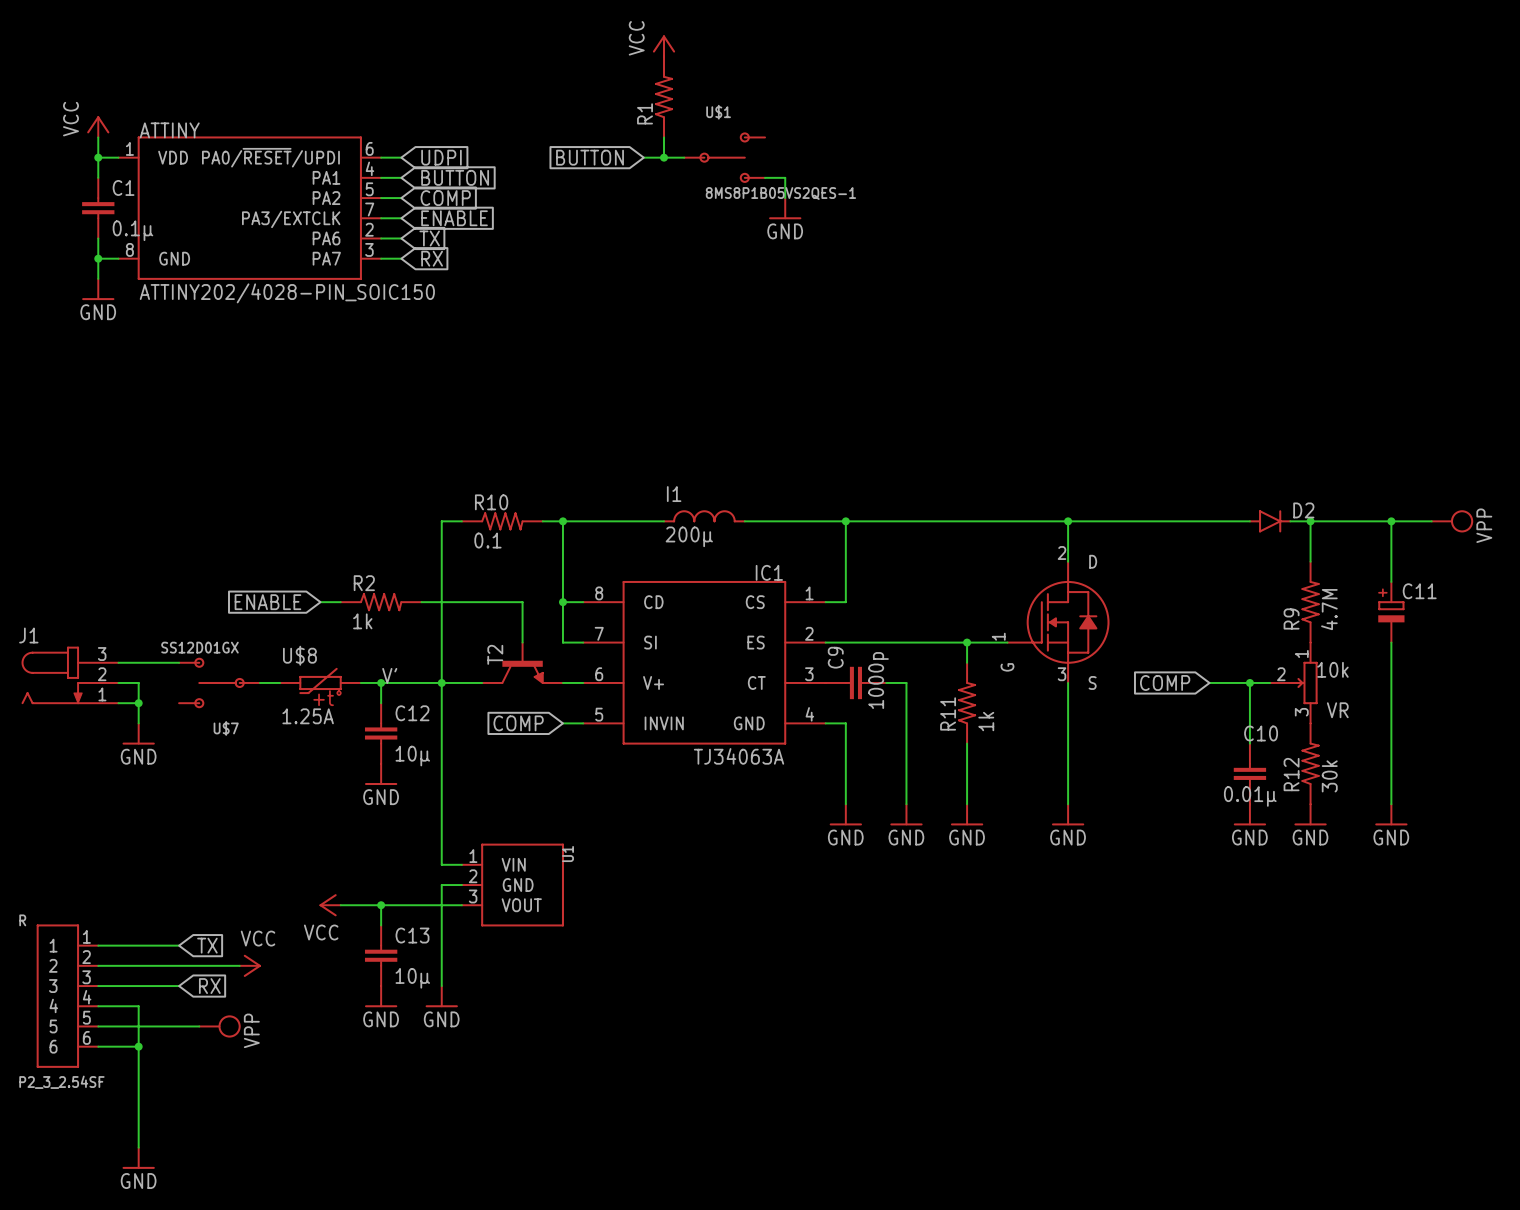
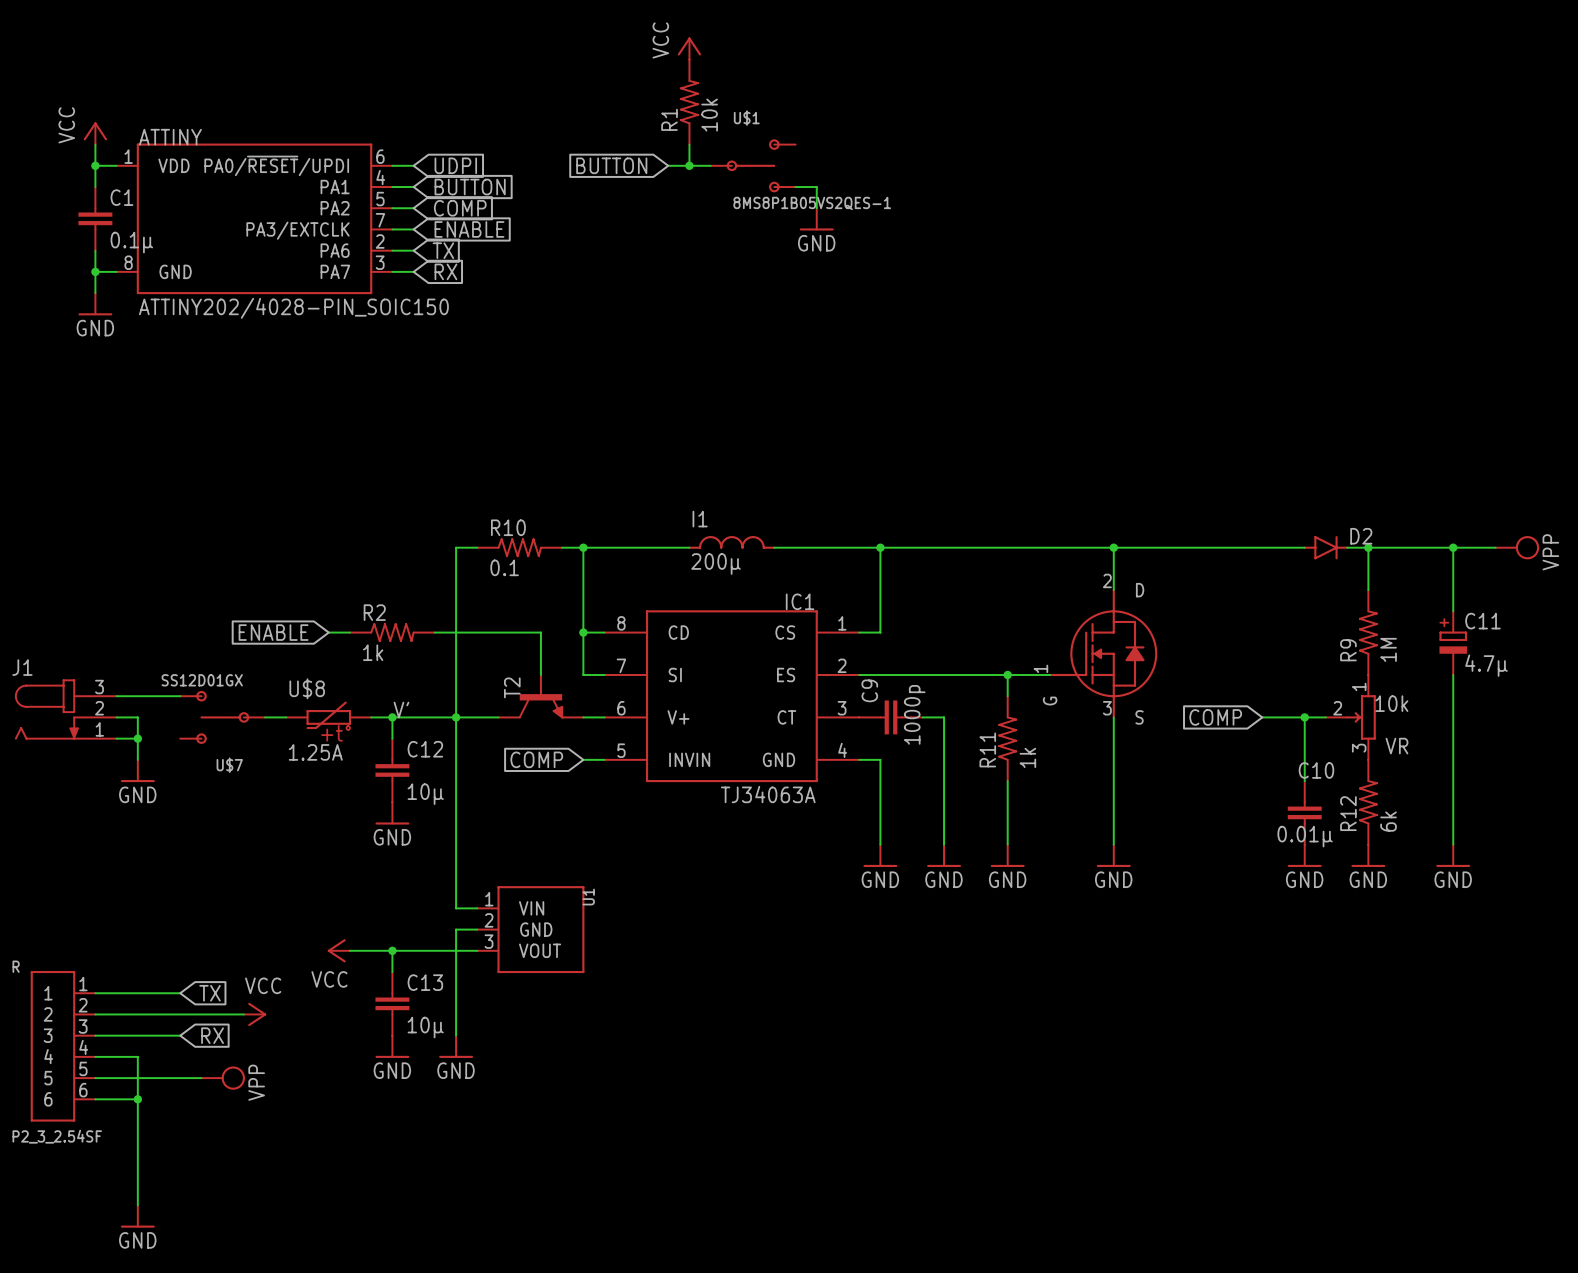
R1 value: none -> 10k (709, 115)
R9 value: 4.7M (1329, 609) -> 1M (1388, 649)
C11 value: none -> 4.7µ (1486, 665)
R12 value: 30k (1329, 776) -> 6k (1388, 821)

